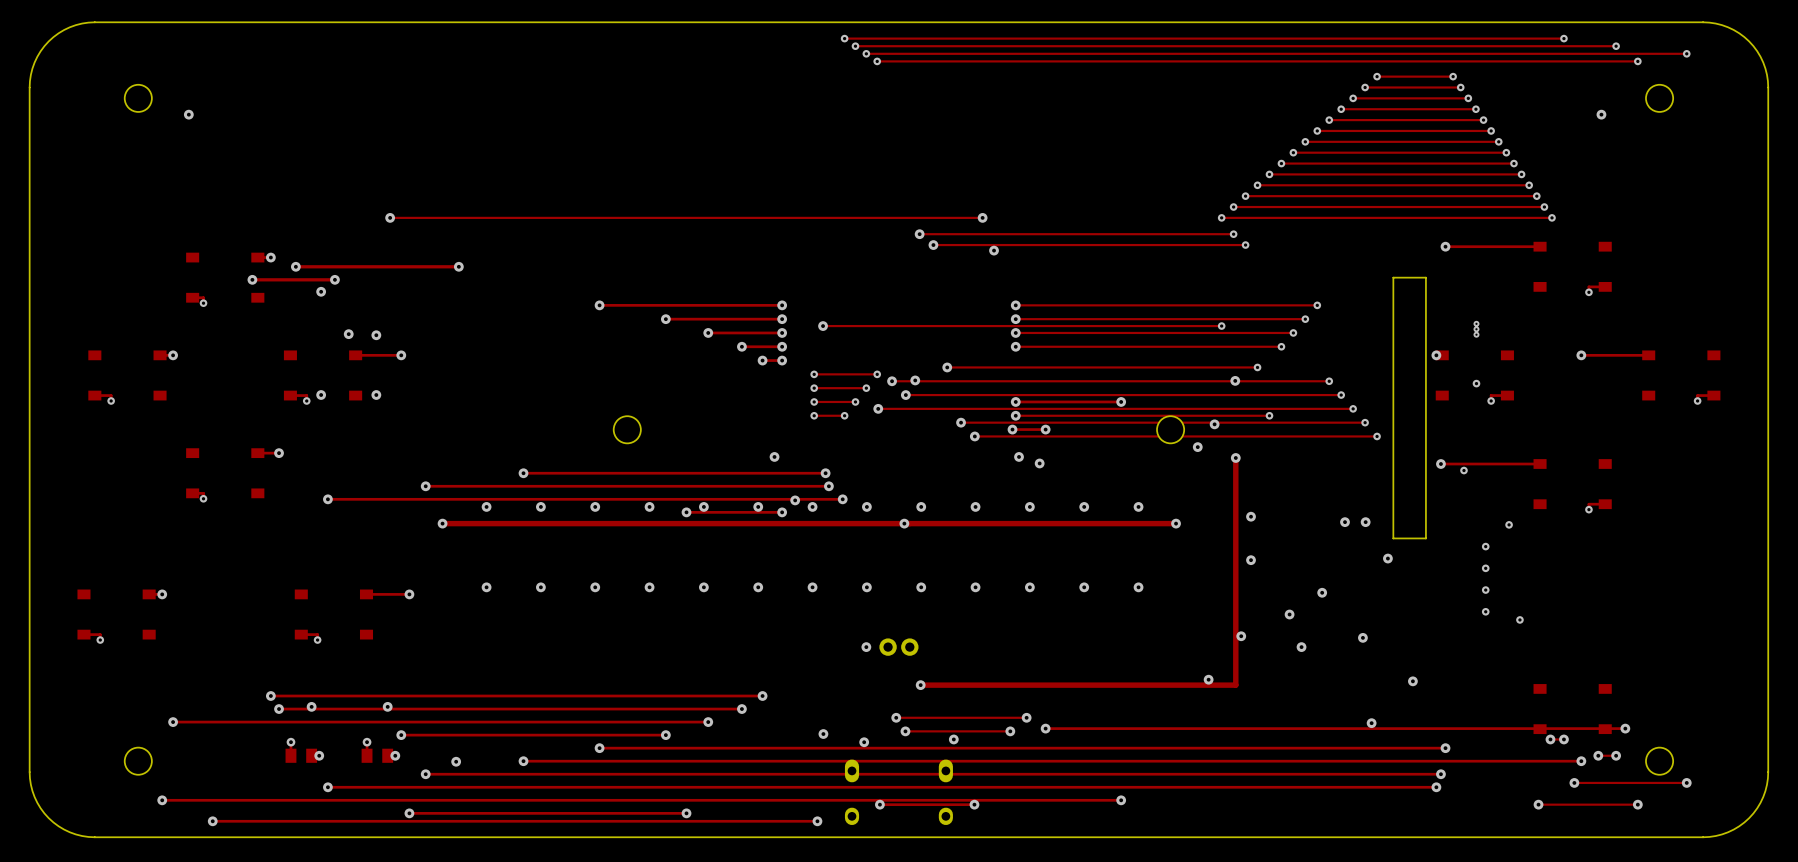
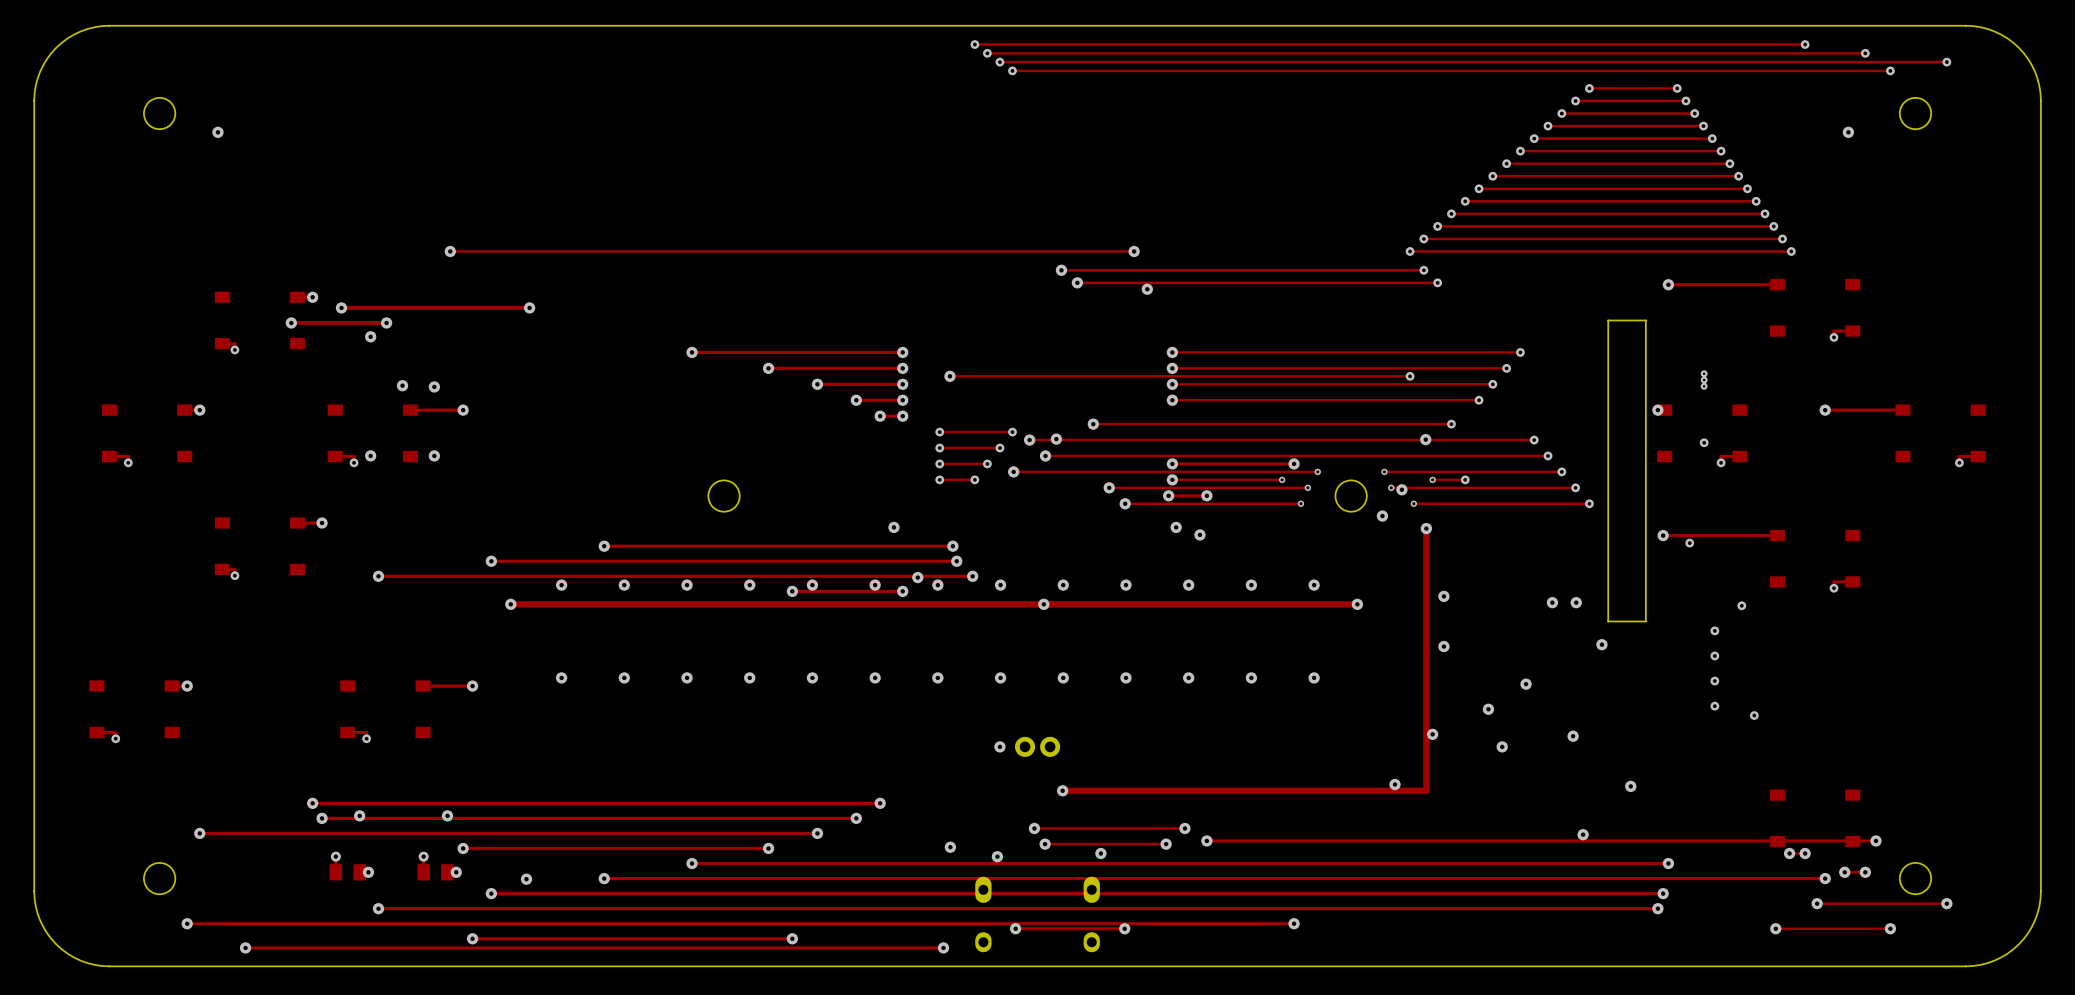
track: (1141, 408) (1199, 408) -> none
via: none -> (1317, 471)
via: none -> (1384, 471)
track: (1110, 415) (1241, 415) -> none
via: none -> (1282, 479)
via: none -> (1432, 479)
track: (1133, 422) (1205, 422) -> none
via: none -> (1307, 487)
via: none -> (1391, 487)
track: (1127, 436) (1224, 436) -> none
via: none -> (1300, 503)
via: none -> (1413, 503)

